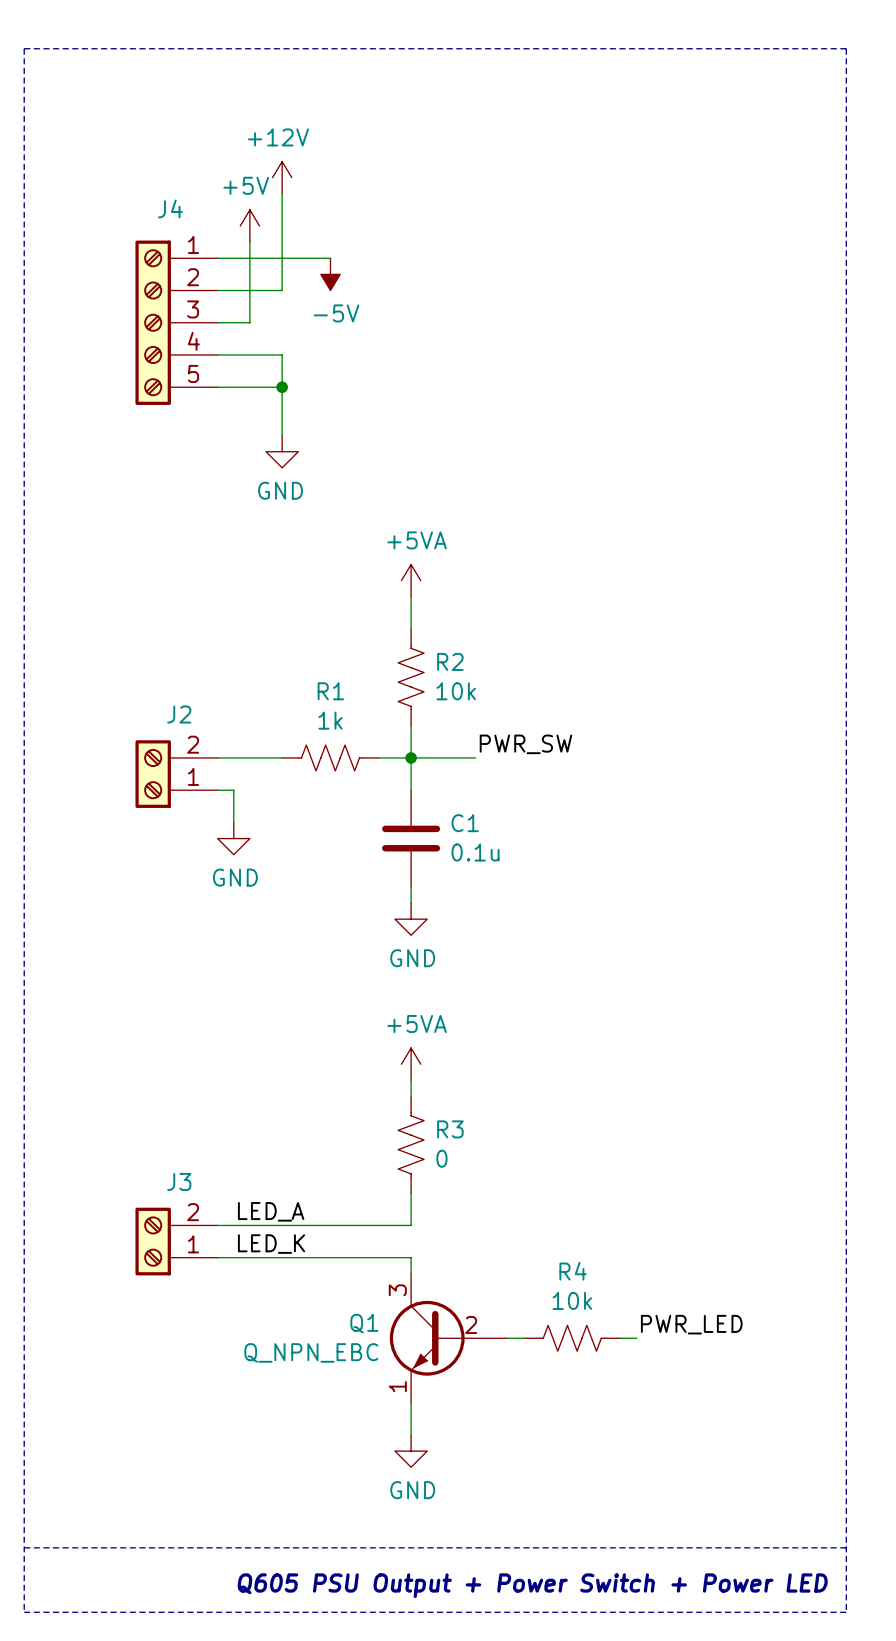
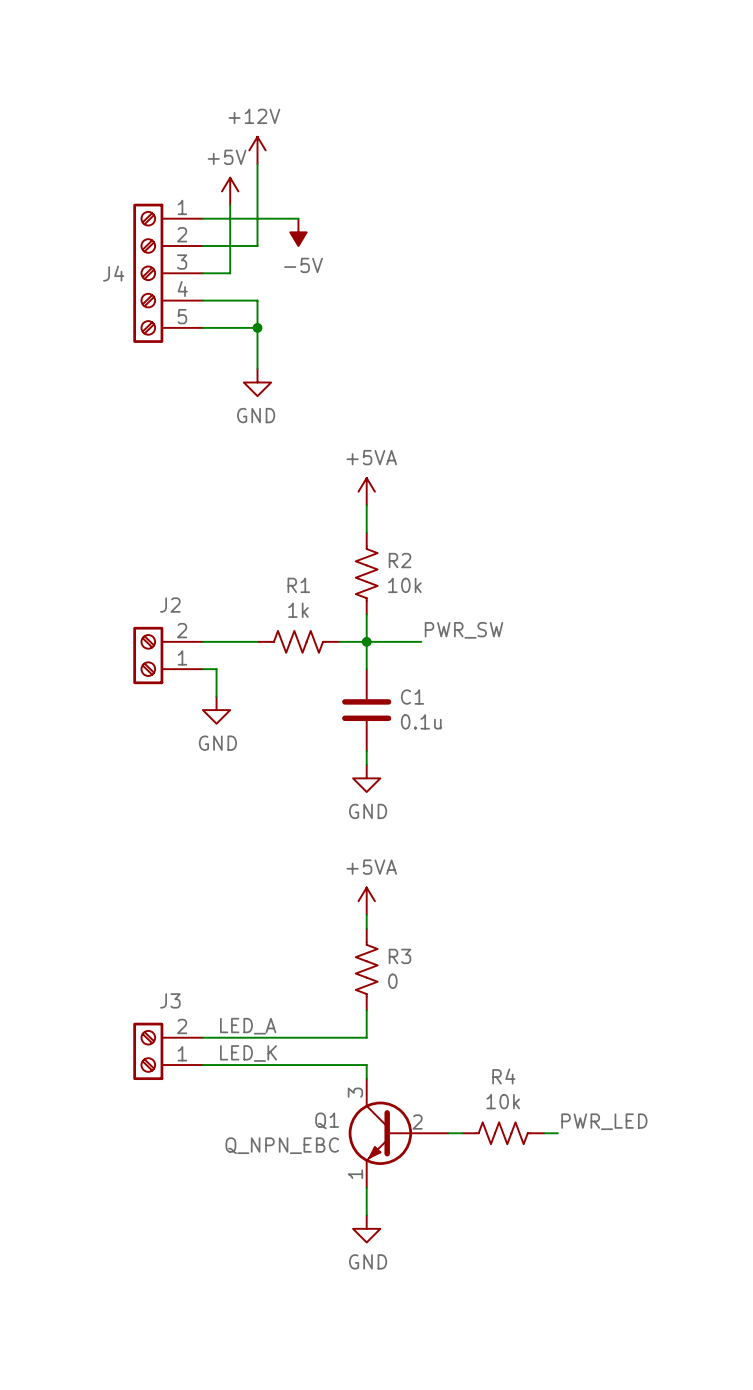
line: (24, 48) (846, 48) (846, 1612) (24, 1612) (24, 48) -> none
J4 name position: J4 (170, 208) -> J4 (113, 273)
line: (24, 1547) (846, 1547) -> none
text: Q605 PSU Output + Power Switch + Power LED (532, 1585) -> none

